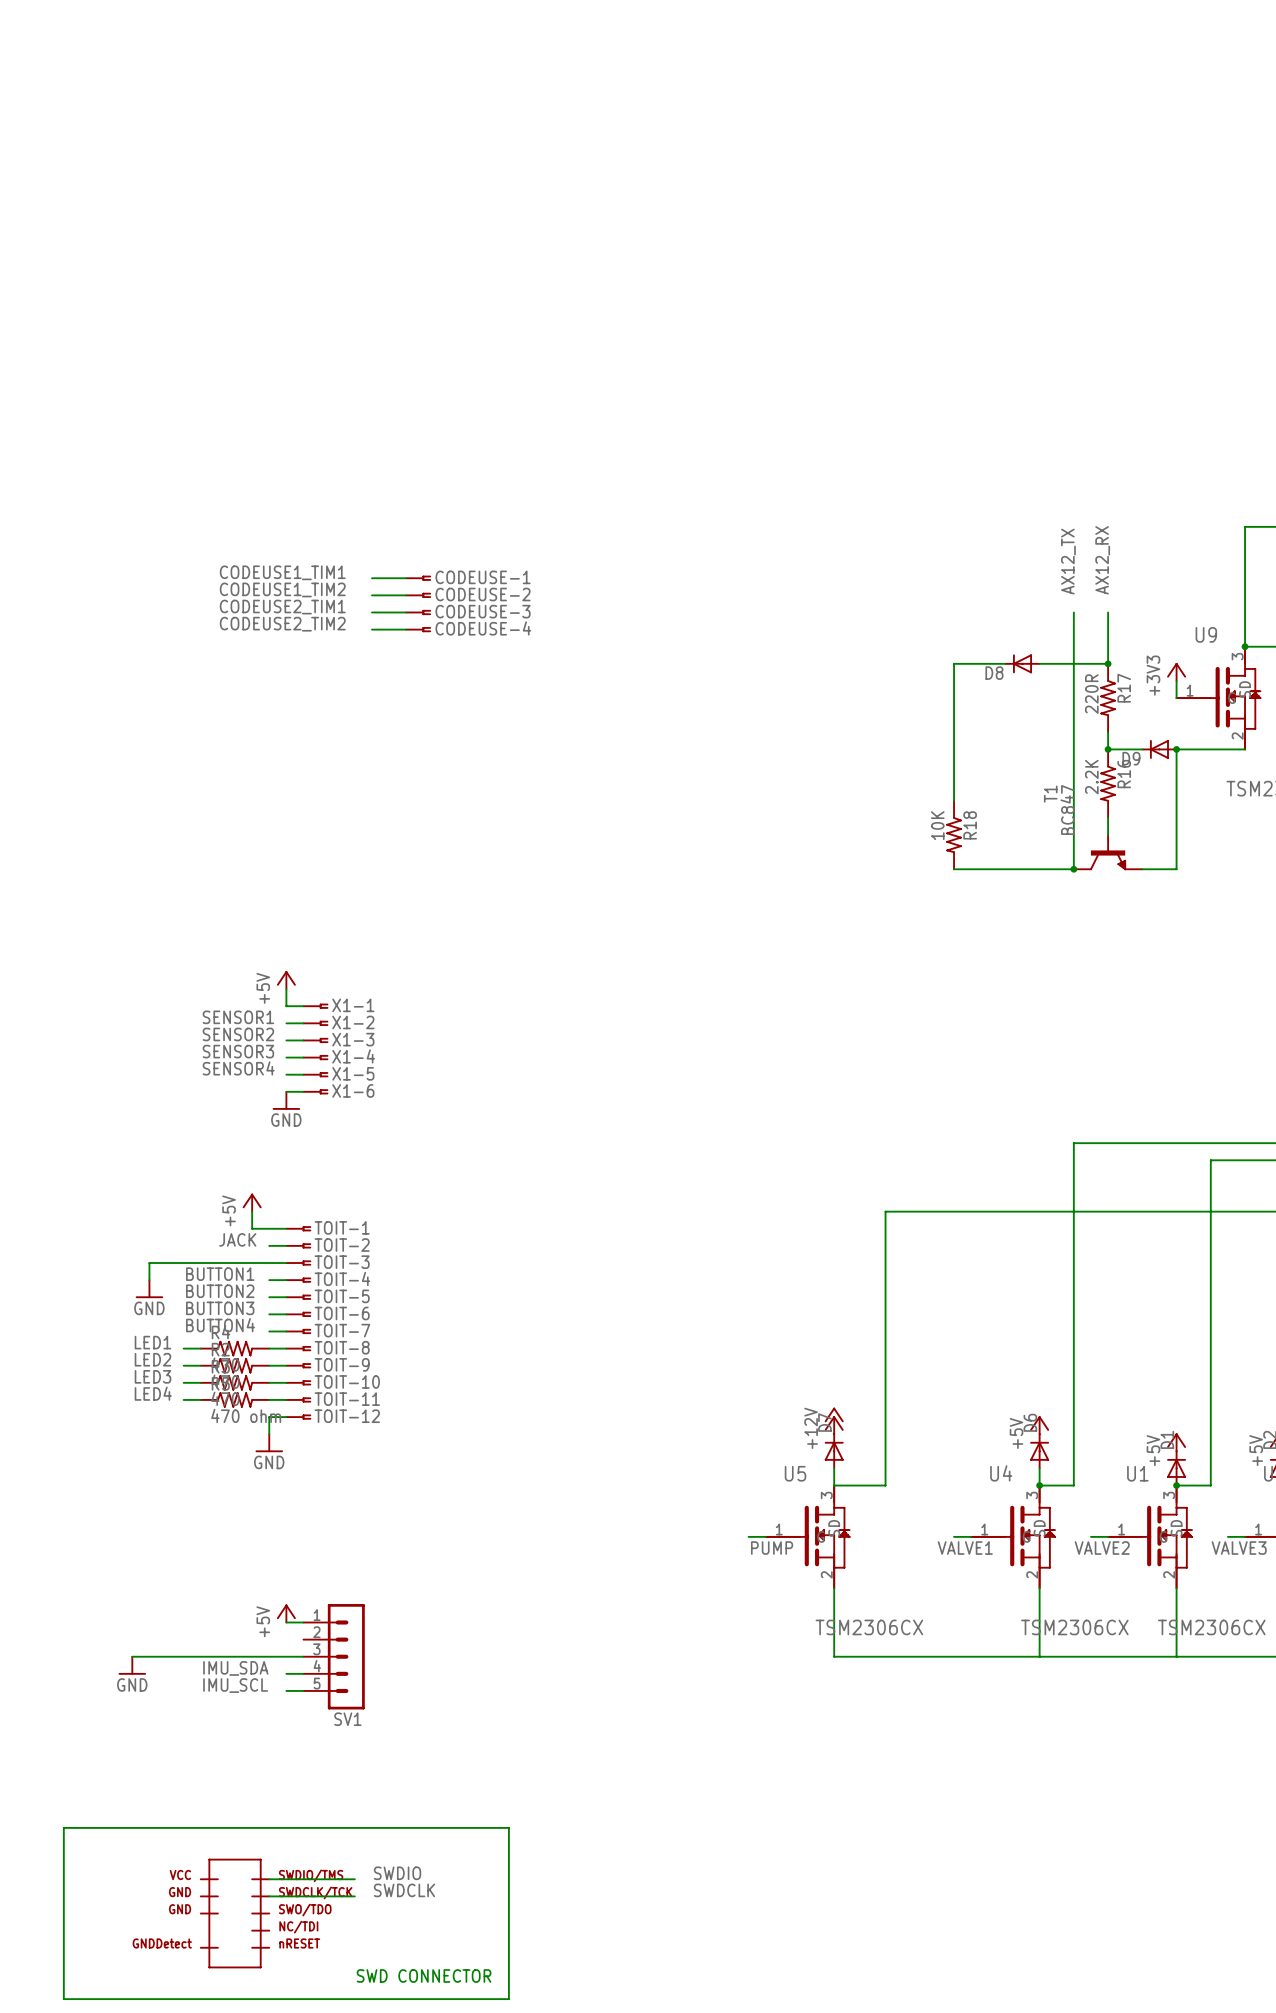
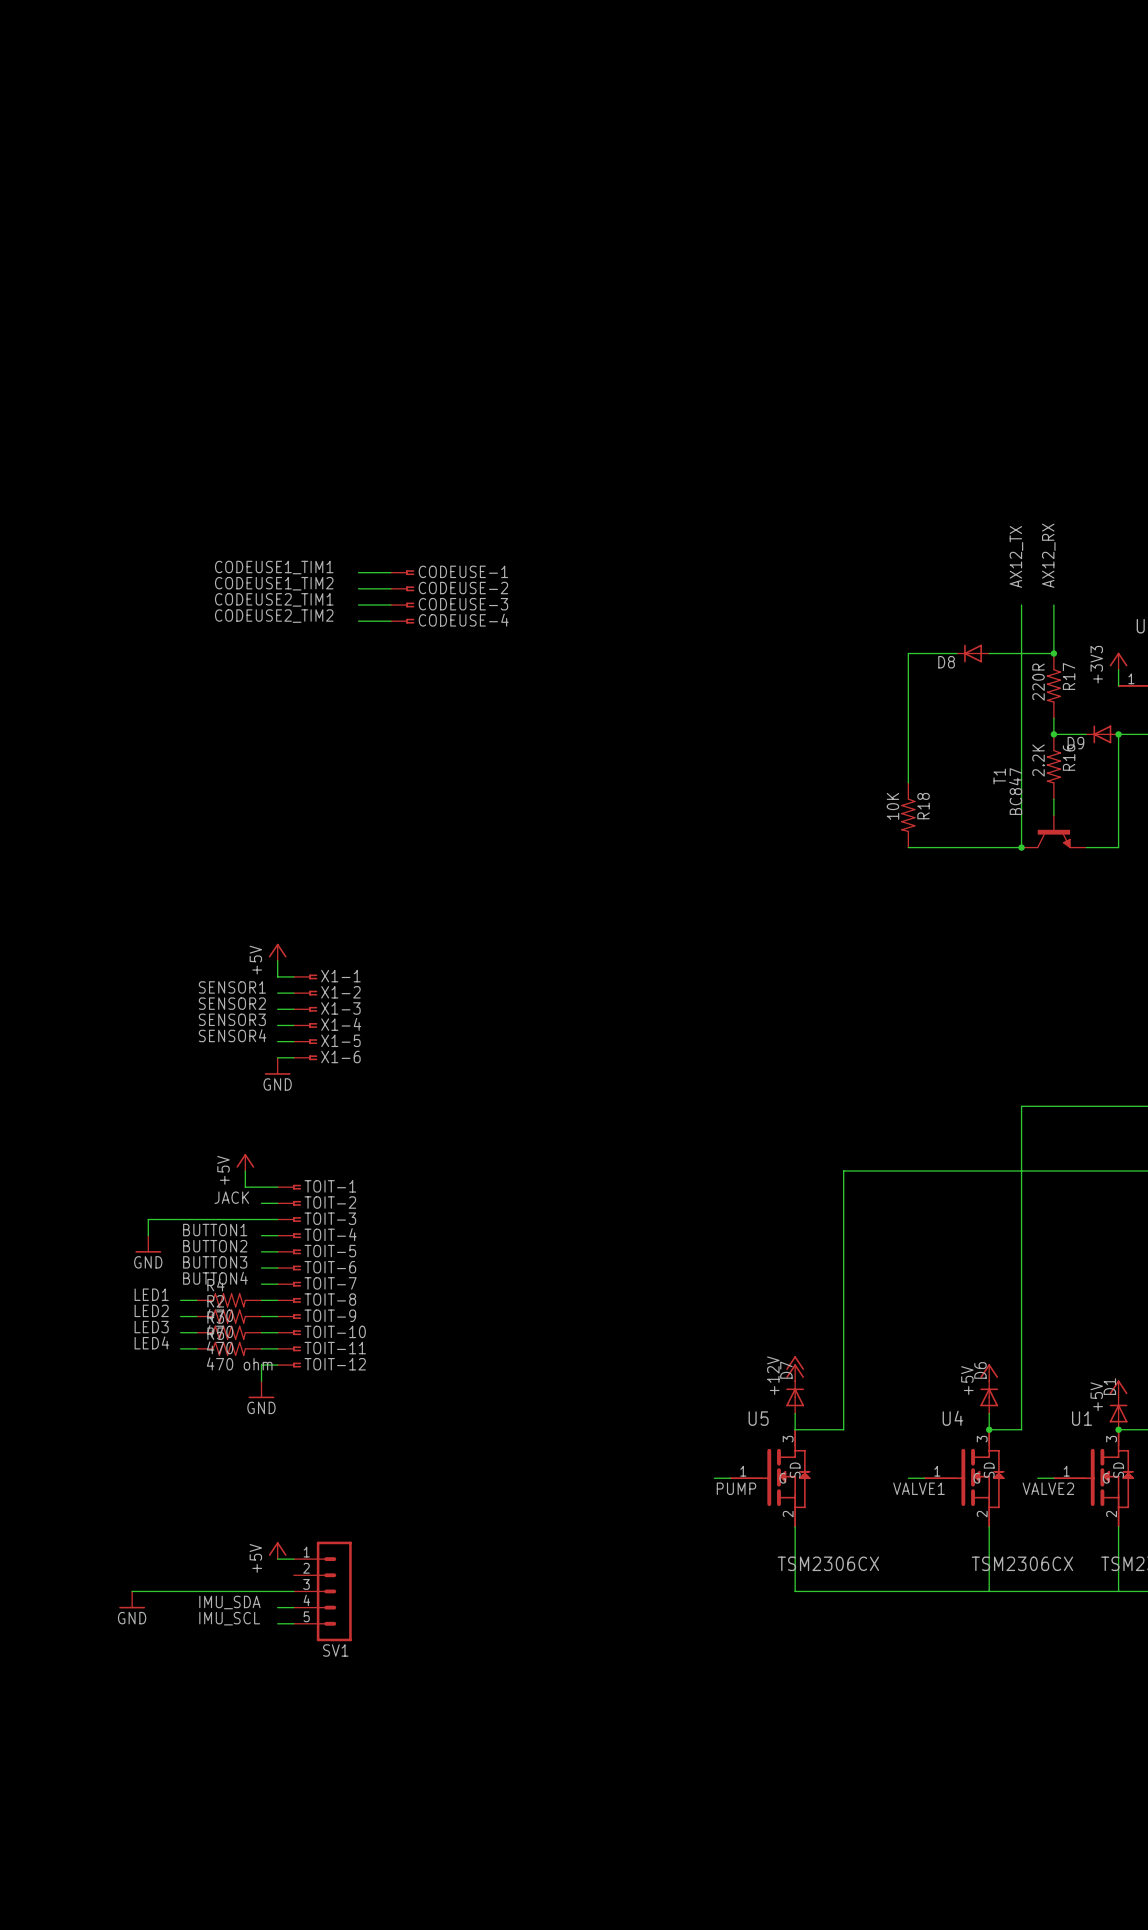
wire: (63, 1827) (63, 1999) (508, 1999) (508, 1827) (63, 1827) -> none
label: SWDIO (397, 1873) -> none
wire: (269, 1879) (354, 1879) -> none
label: SWDCLK (404, 1890) -> none
wire: (269, 1896) (354, 1896) -> none
part: (235, 1913) -> none
text: SWD CONNECTOR (424, 1976) -> none

